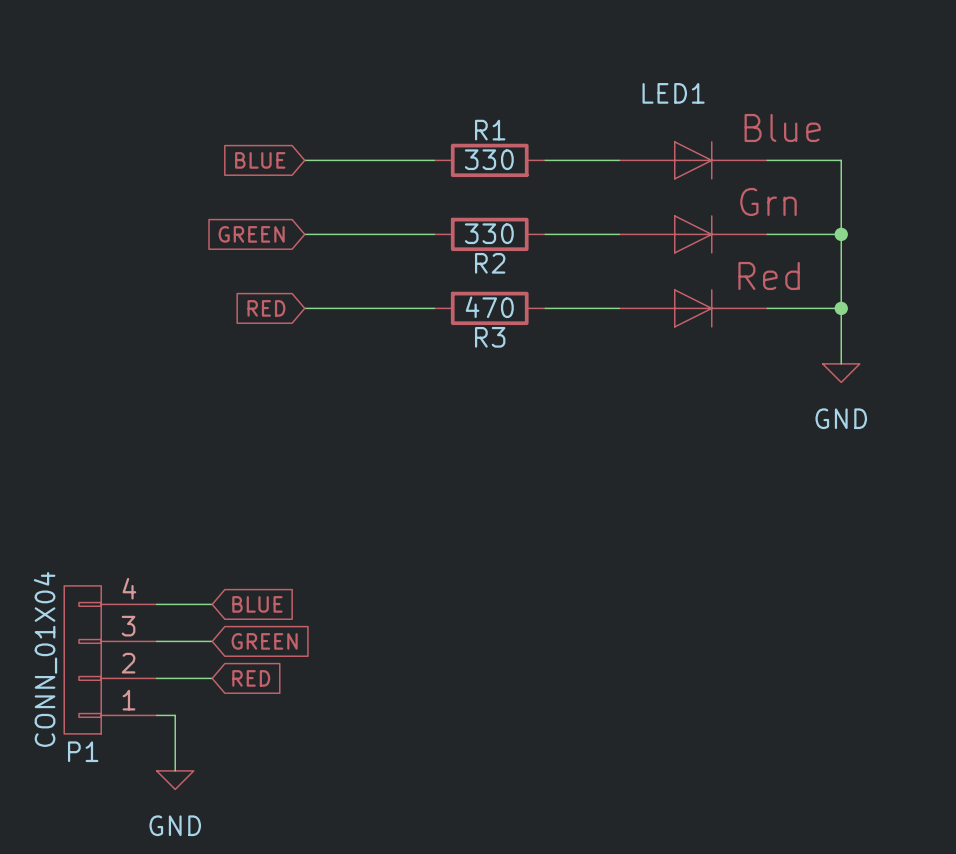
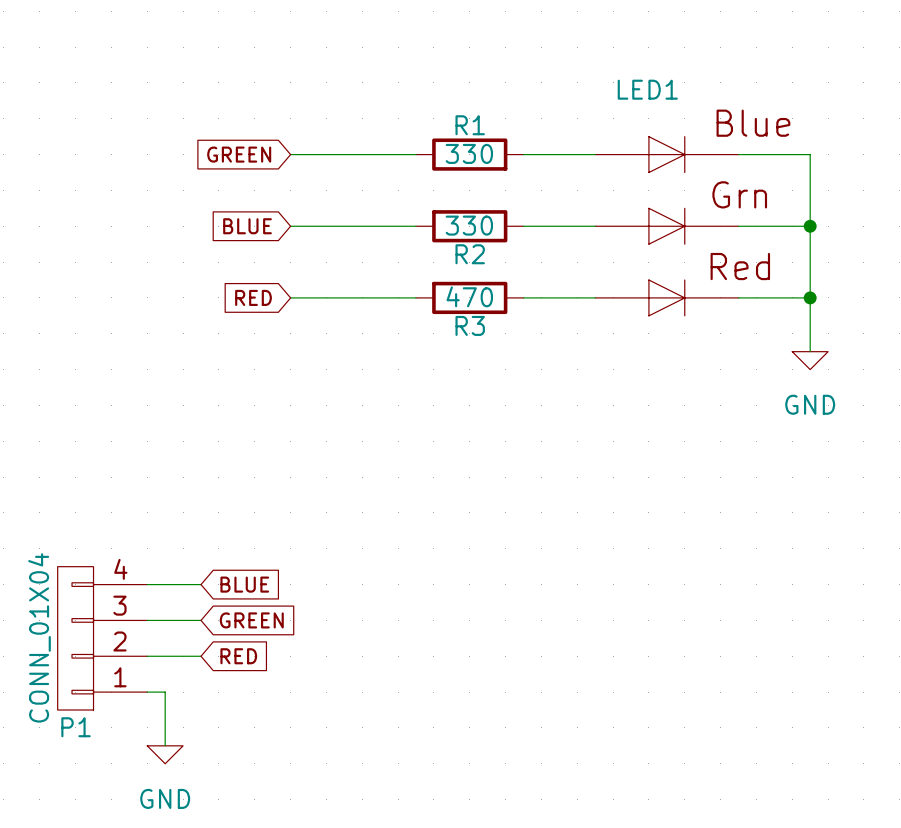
global label: BLUE (260, 160) -> GREEN (239, 154)
global label: GREEN (251, 234) -> BLUE (247, 226)

